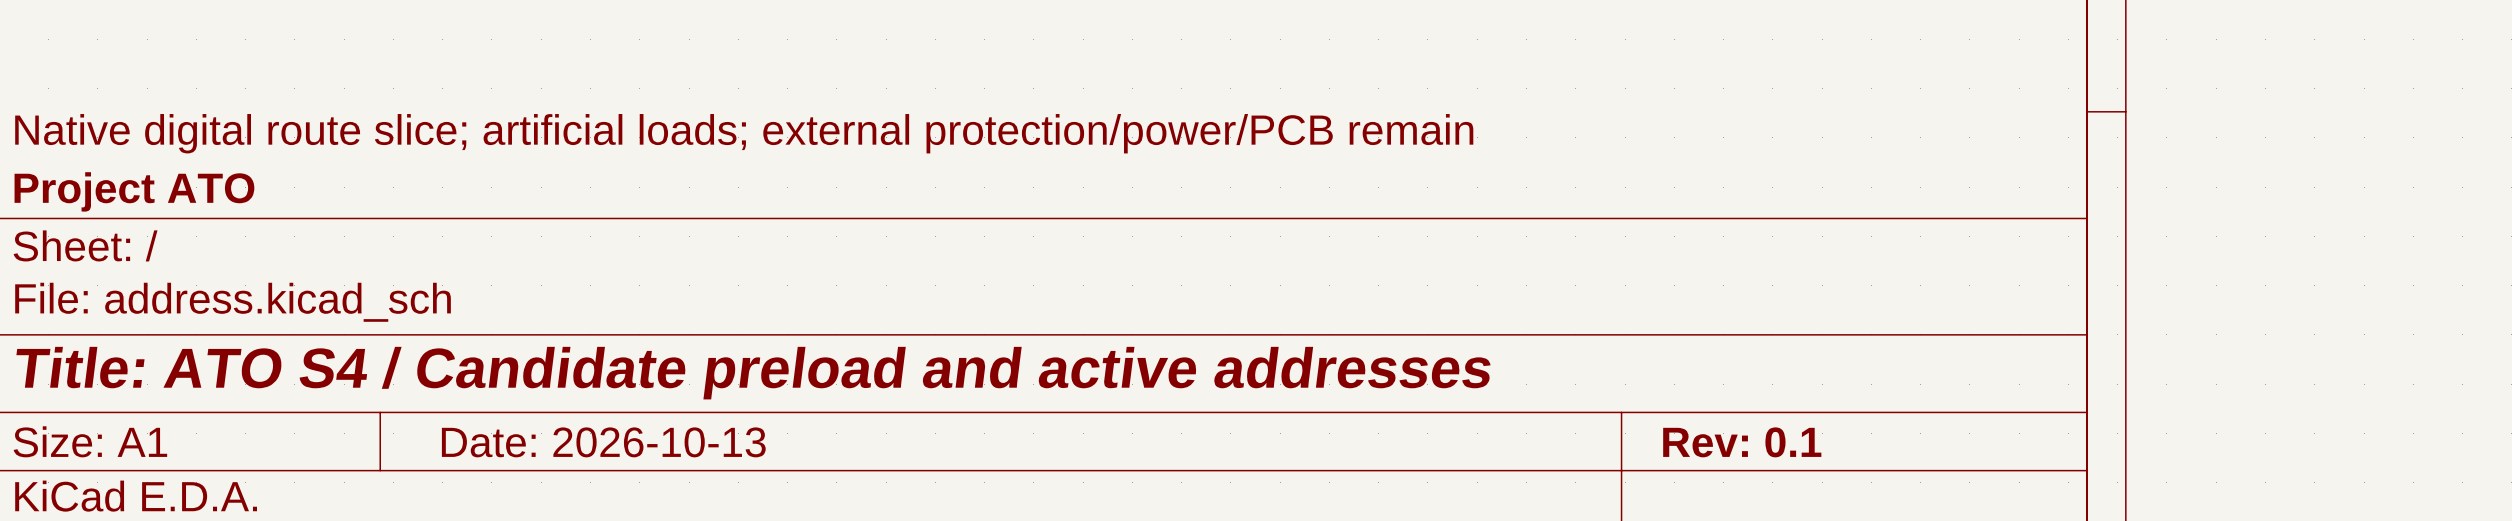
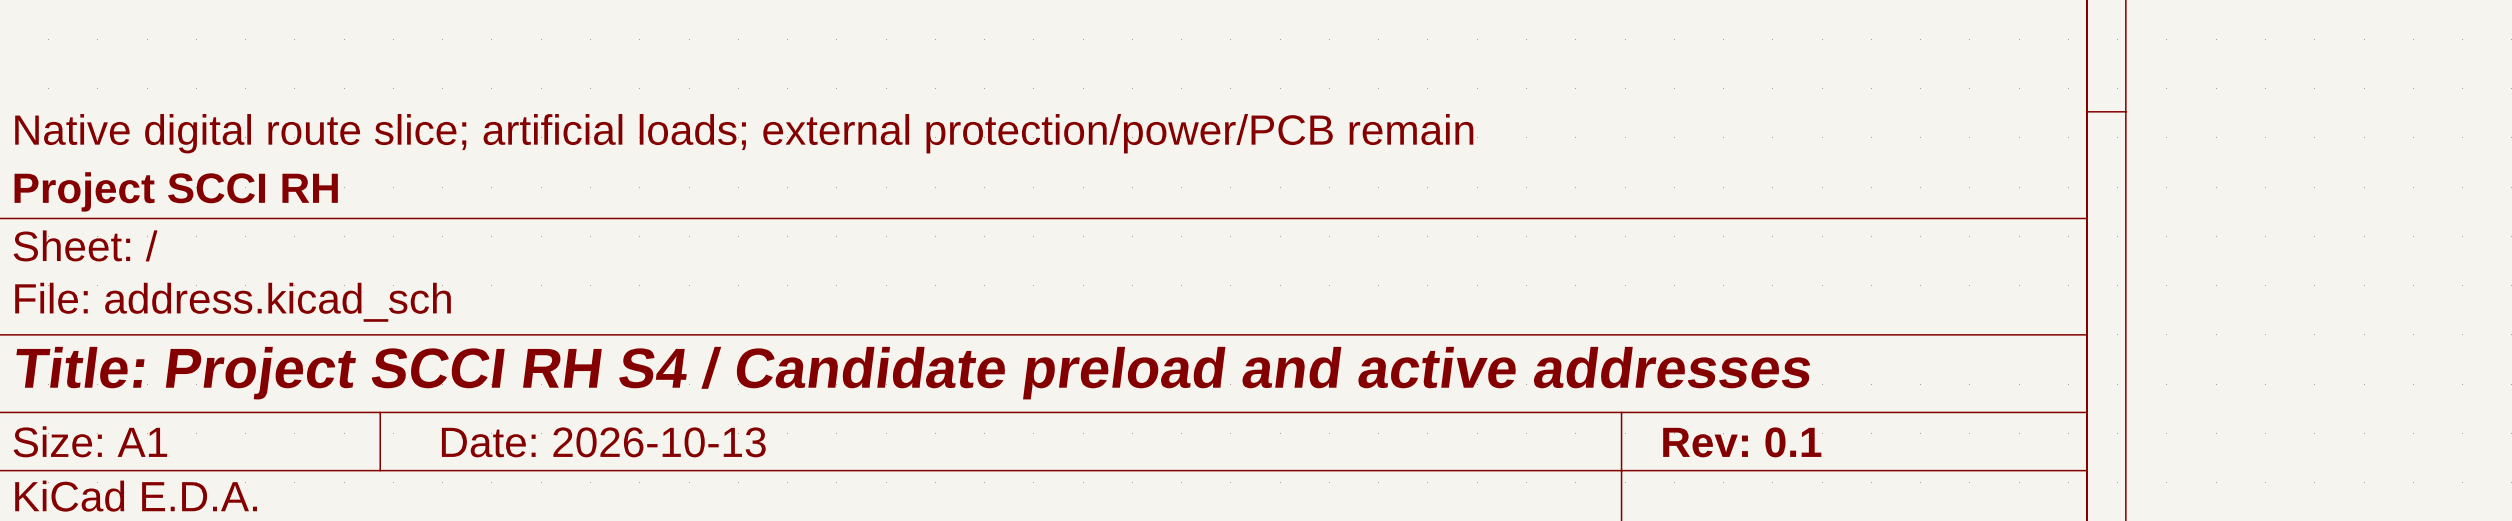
title block: Project ATO (134, 191) -> Project SCCI RH (176, 191)
title block: Title: ATO S4 / Candidate preload and active addresses (753, 373) -> Title: Project SCCI RH S4 / Candidate preload and active addresses (913, 373)

